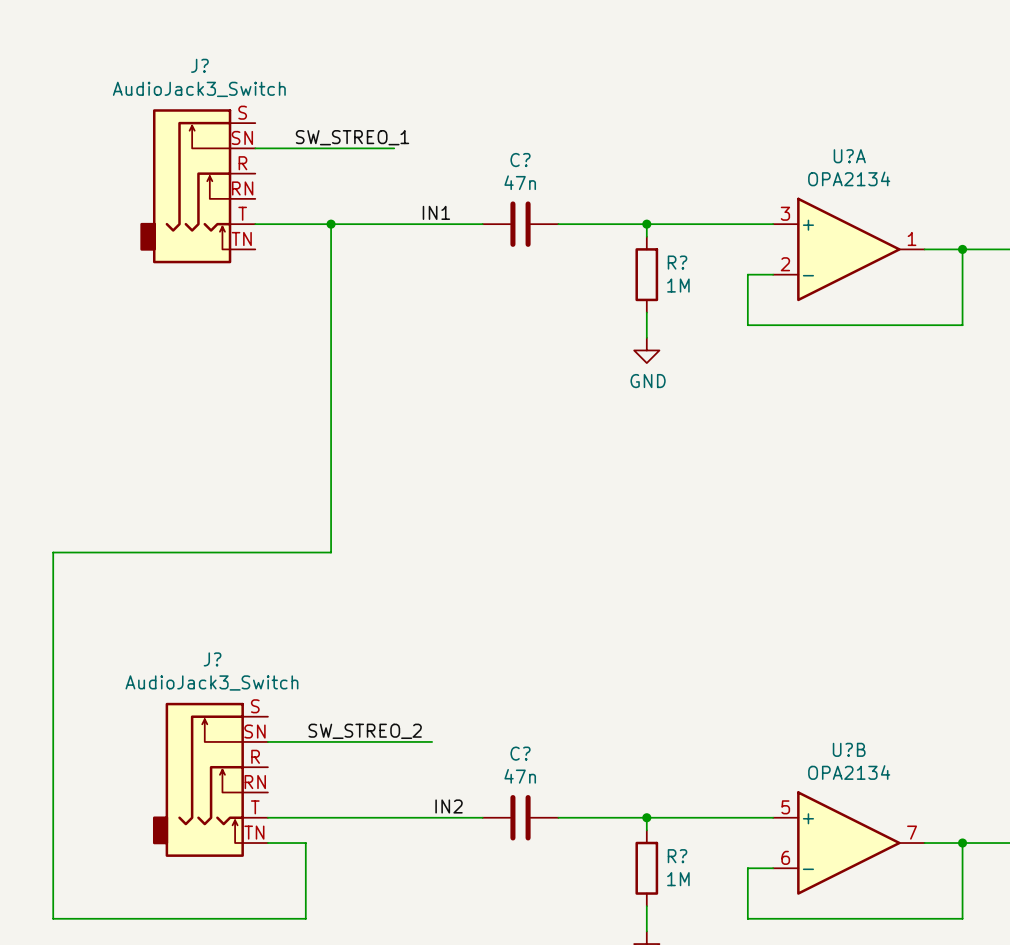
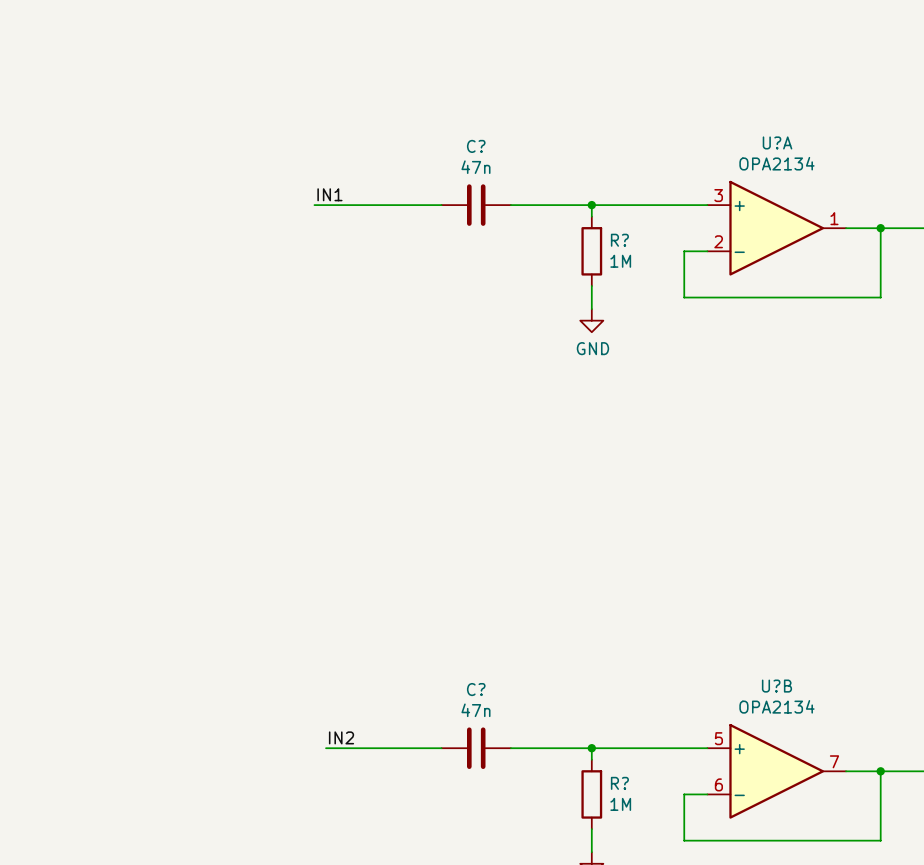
label: SW_STREO_1 (352, 137) -> none
wire: (255, 148) (394, 148) -> none
J?: AudioJack3_Switch (197, 186) -> none
label position: IN1 (436, 212) -> IN1 (329, 194)
wire: (255, 224) (343, 224) -> none
wire: (331, 224) (331, 552) (53, 552) (53, 918) (305, 918) (305, 843) (267, 843) -> none
junction: (331, 224) -> none
label: SW_STREO_2 (365, 731) -> none
wire: (267, 741) (432, 741) -> none
J?: AudioJack3_Switch (210, 779) -> none
label position: IN2 (449, 806) -> IN2 (341, 737)
wire: (267, 817) (356, 817) -> none

